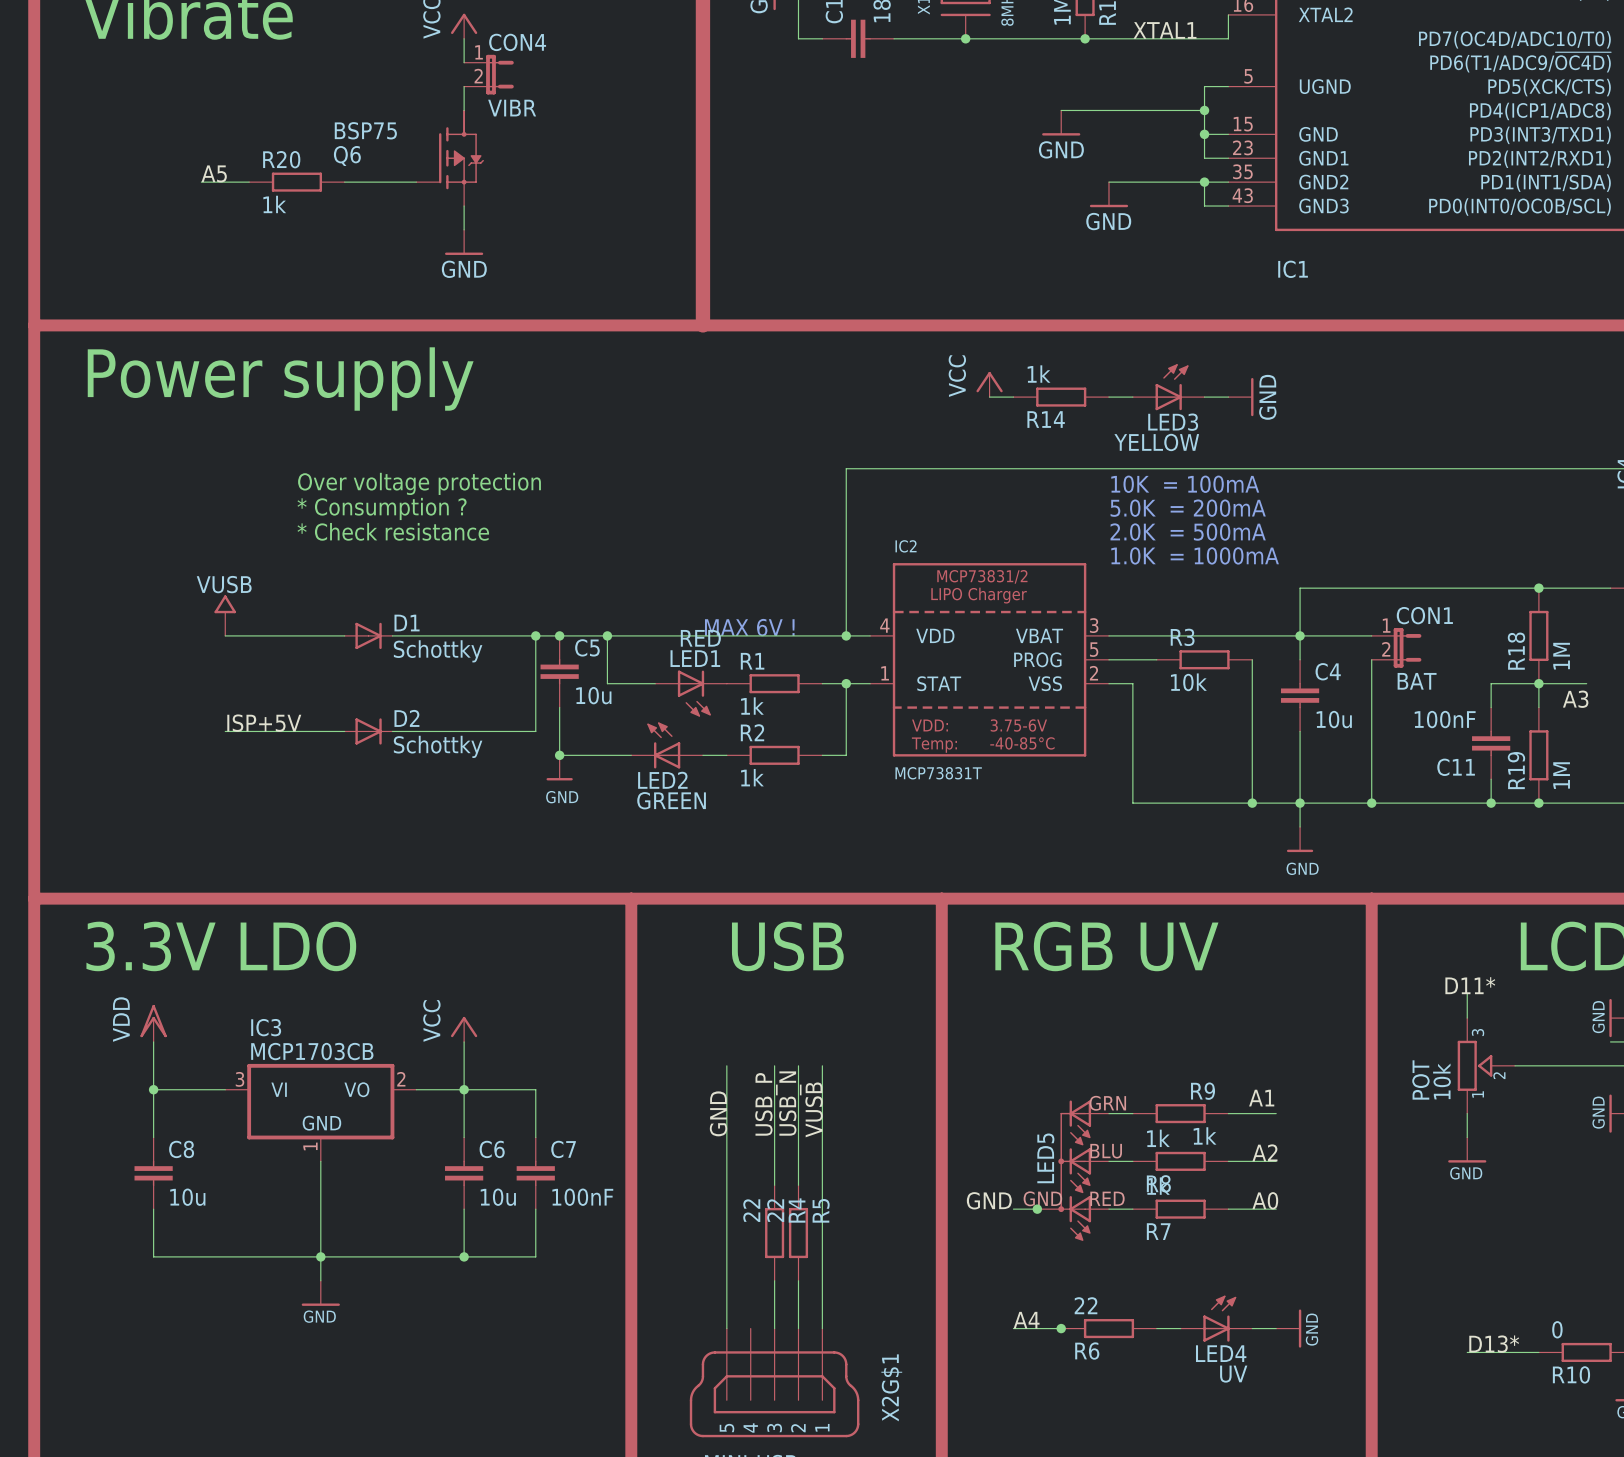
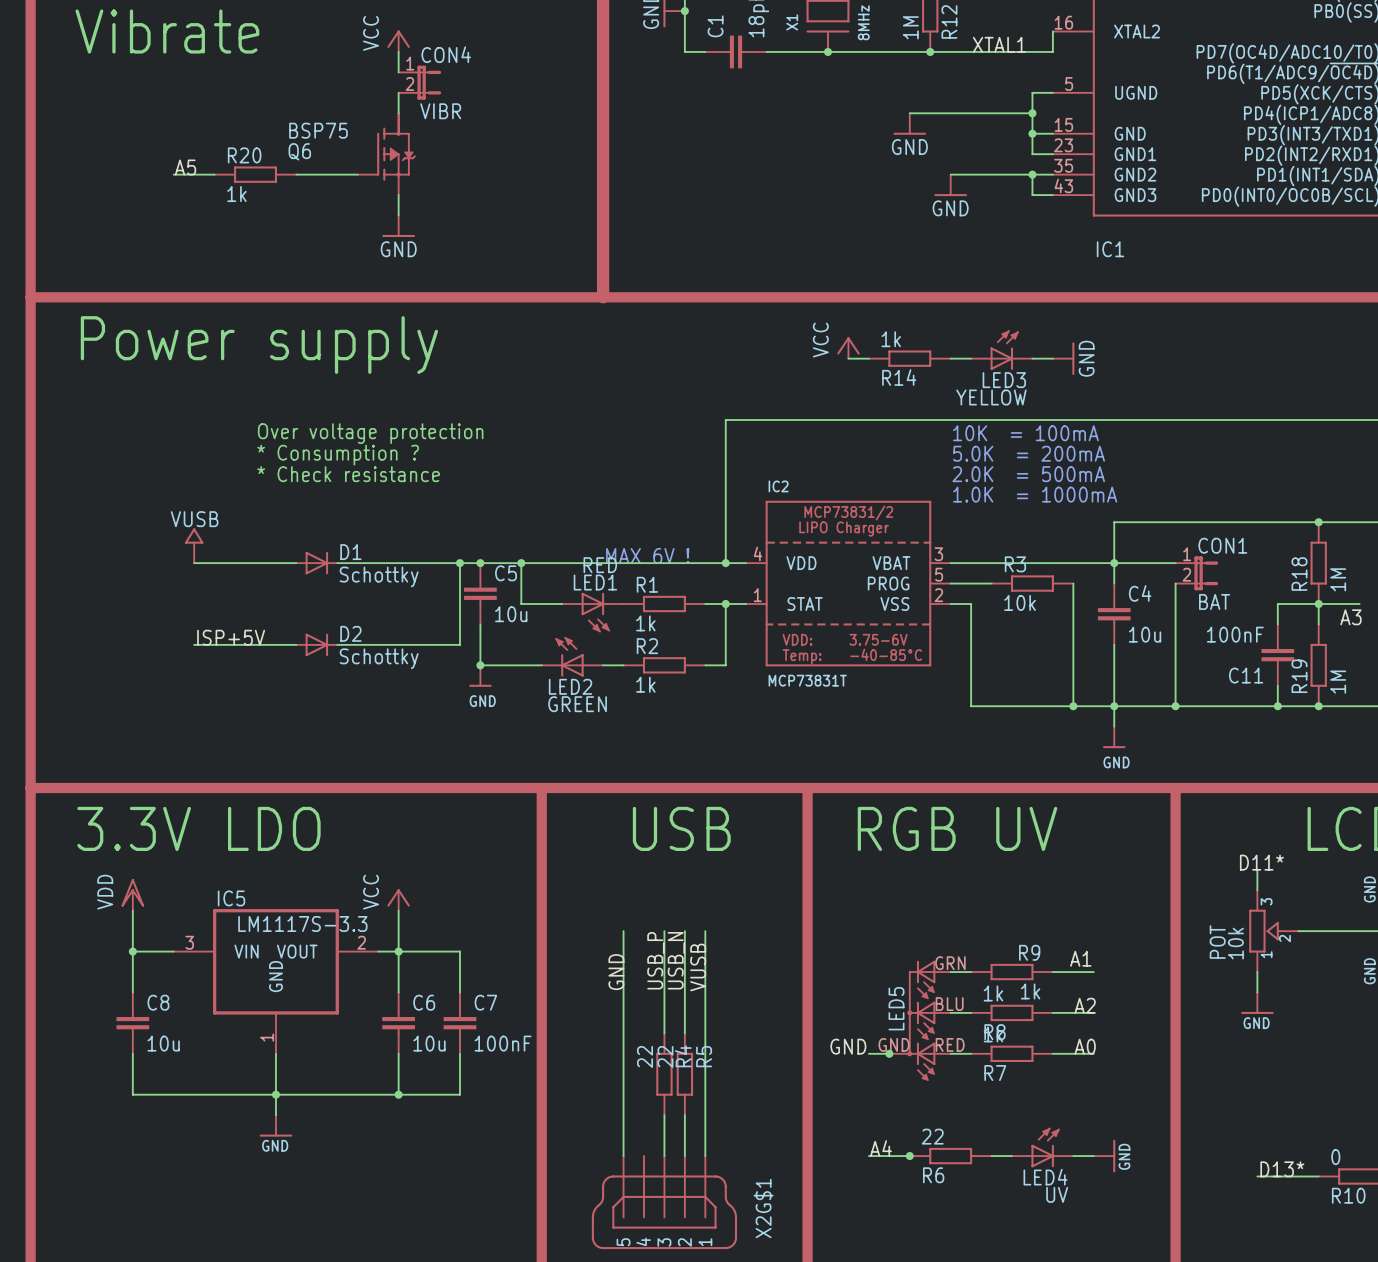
IC3: MCP1703CB (320, 1112) -> none
IC5: none -> LM1117S-3.3 (275, 981)

